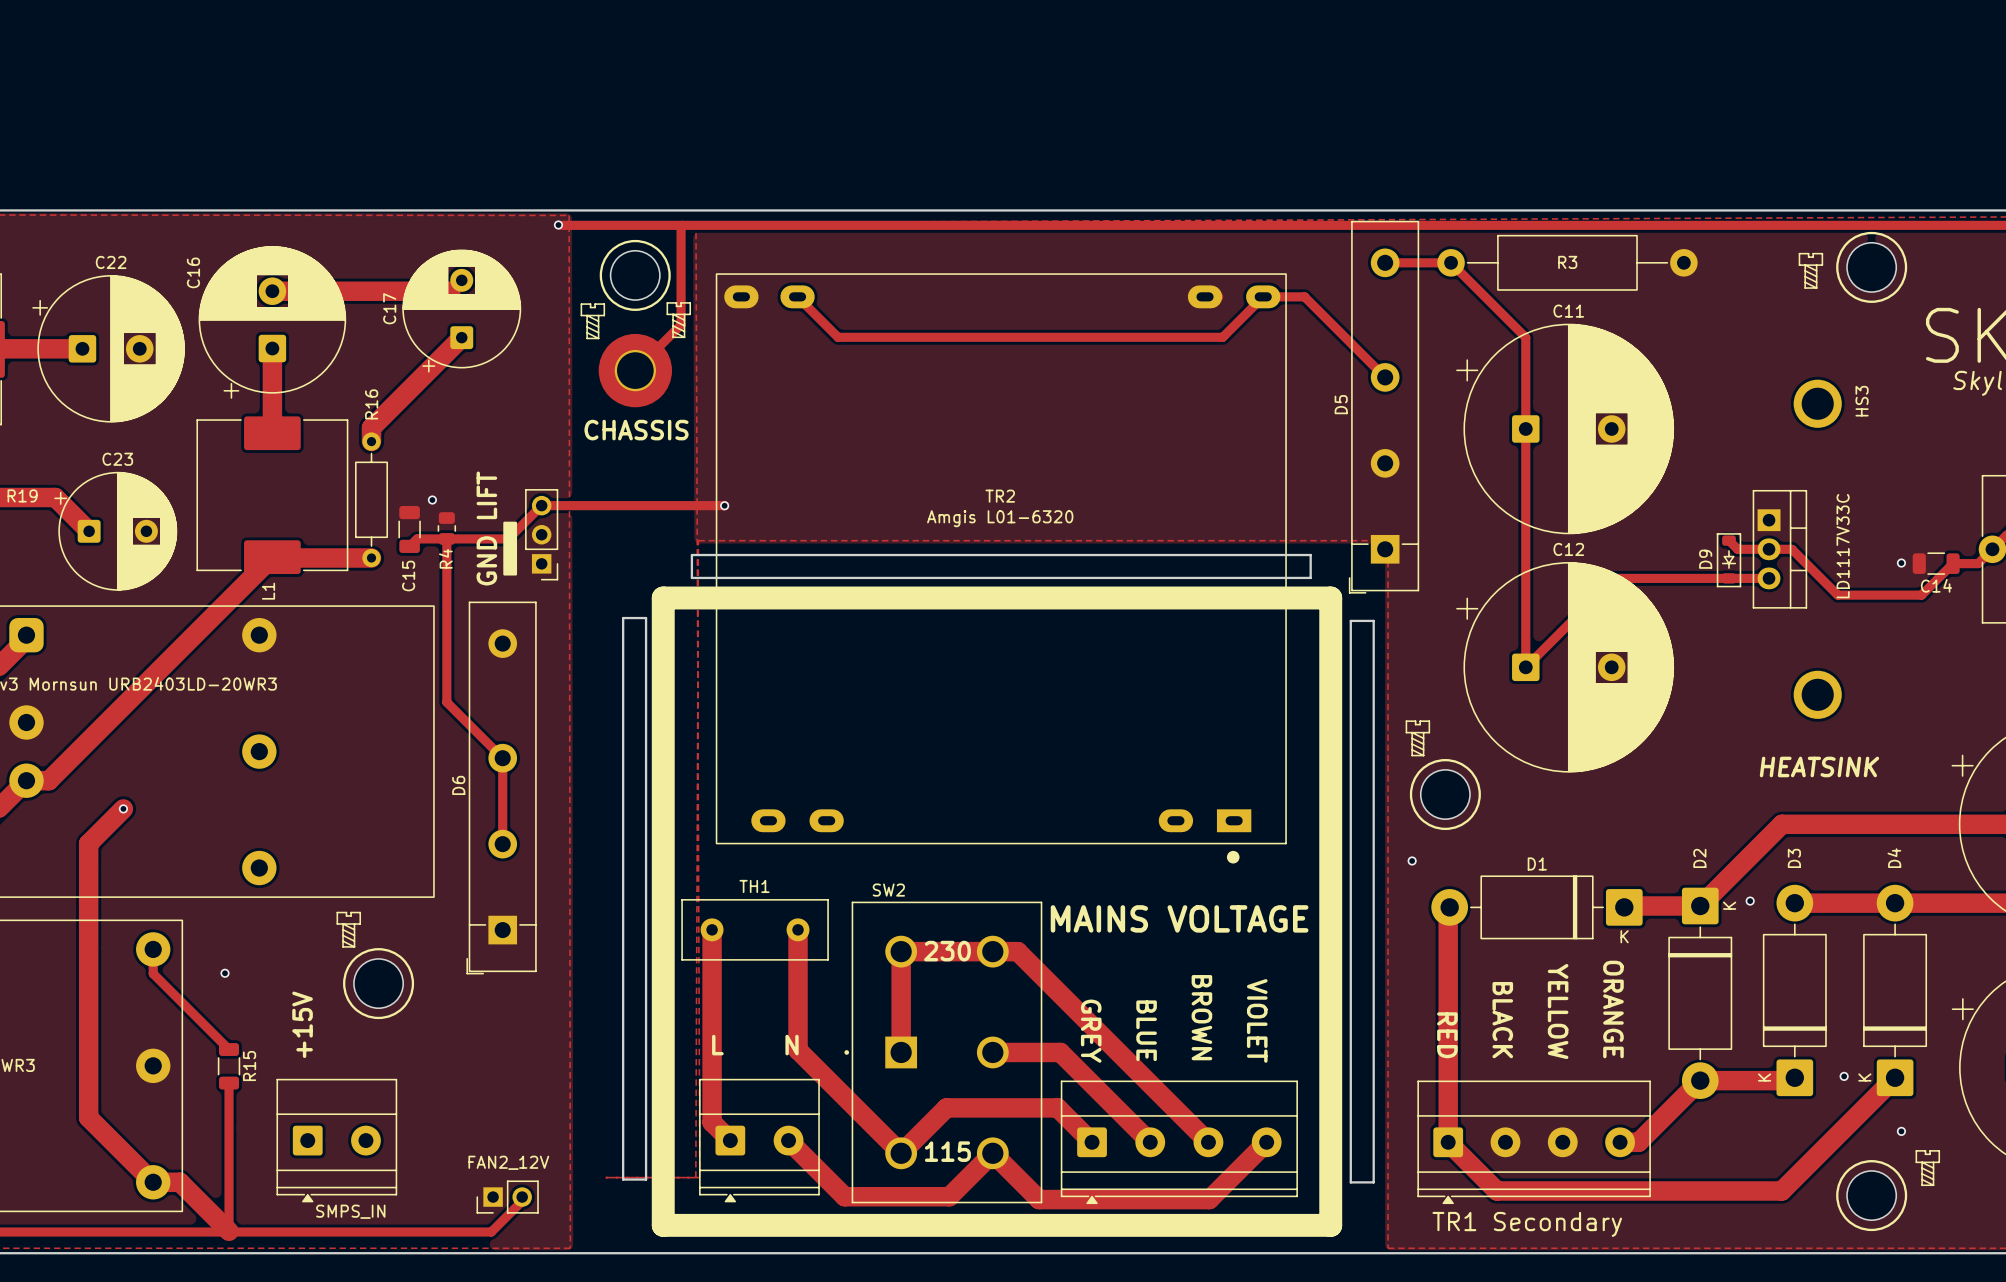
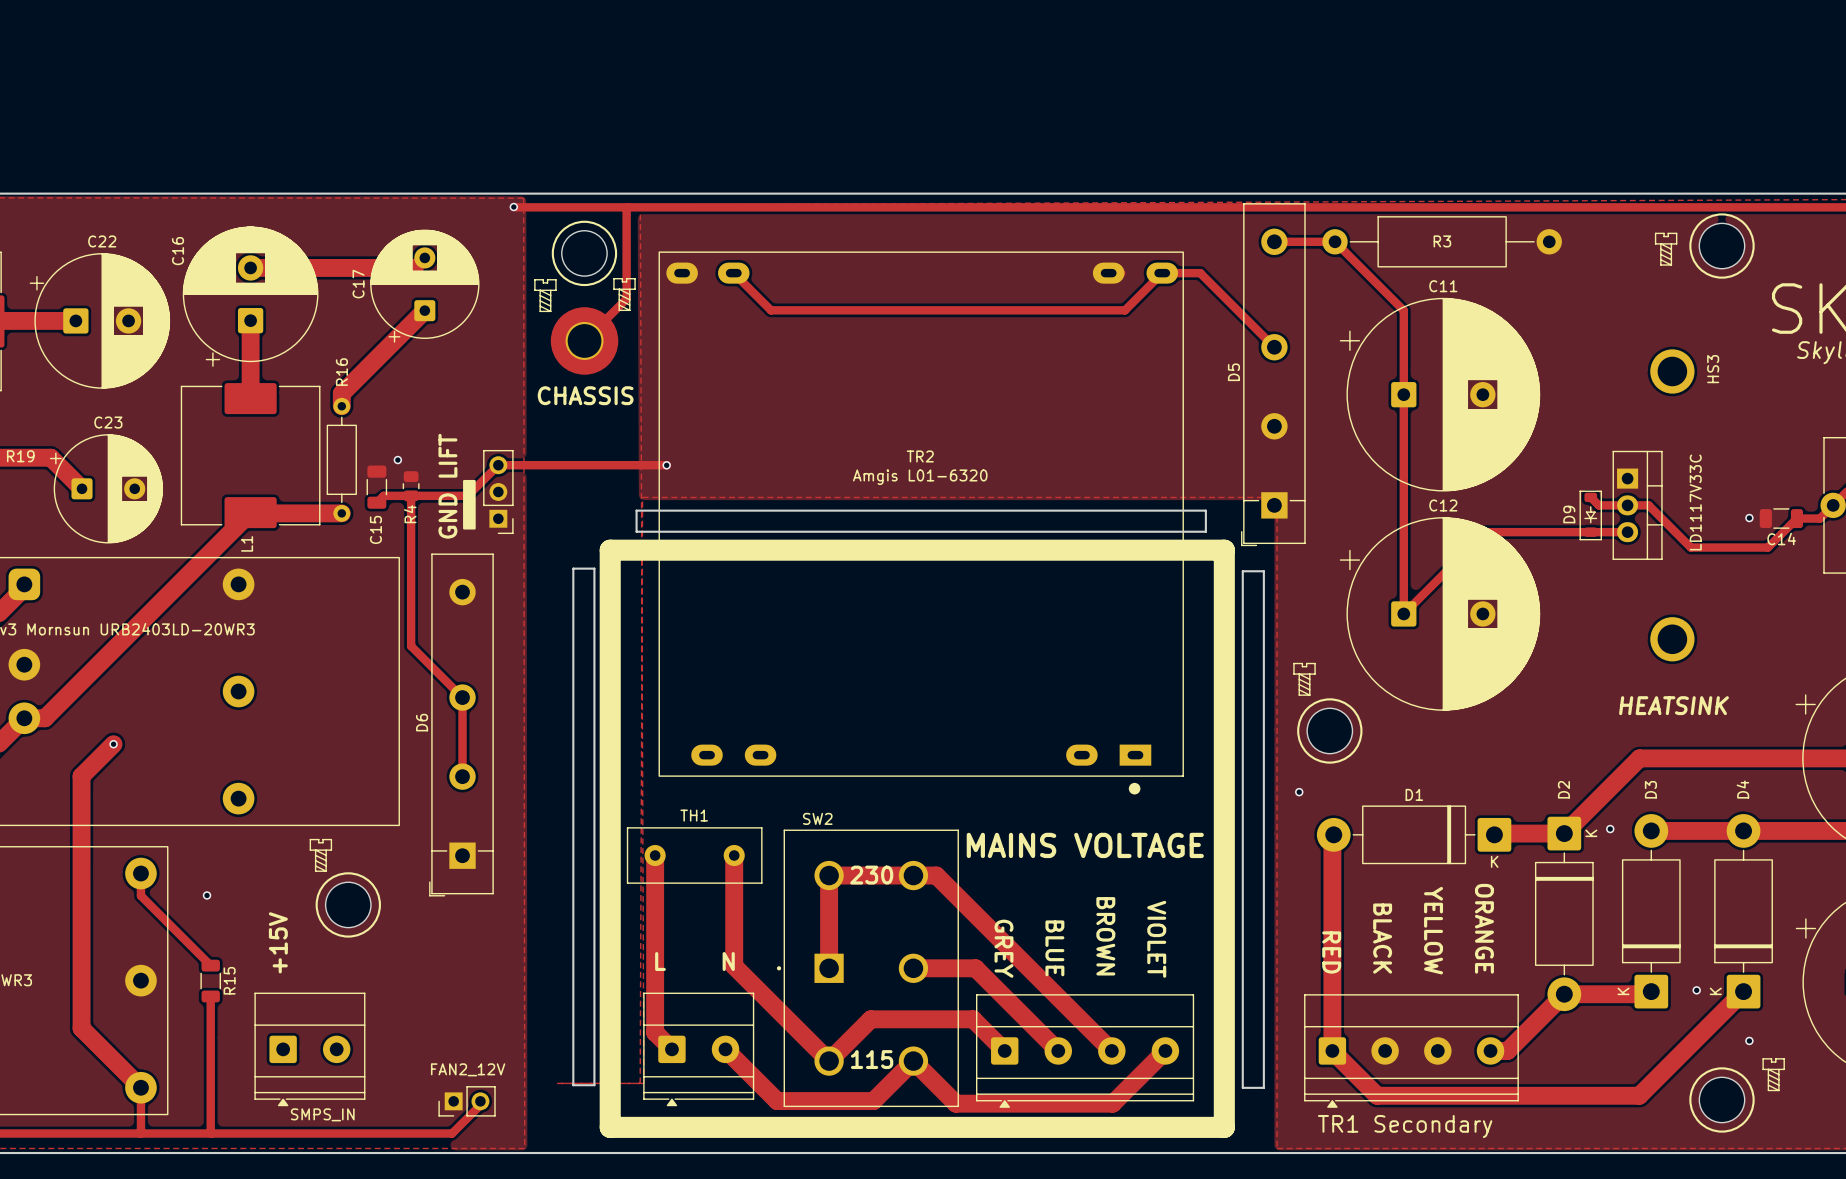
track: (153, 1182) (179, 1182) (229, 1231) -> (140, 1087) (140, 1133)

